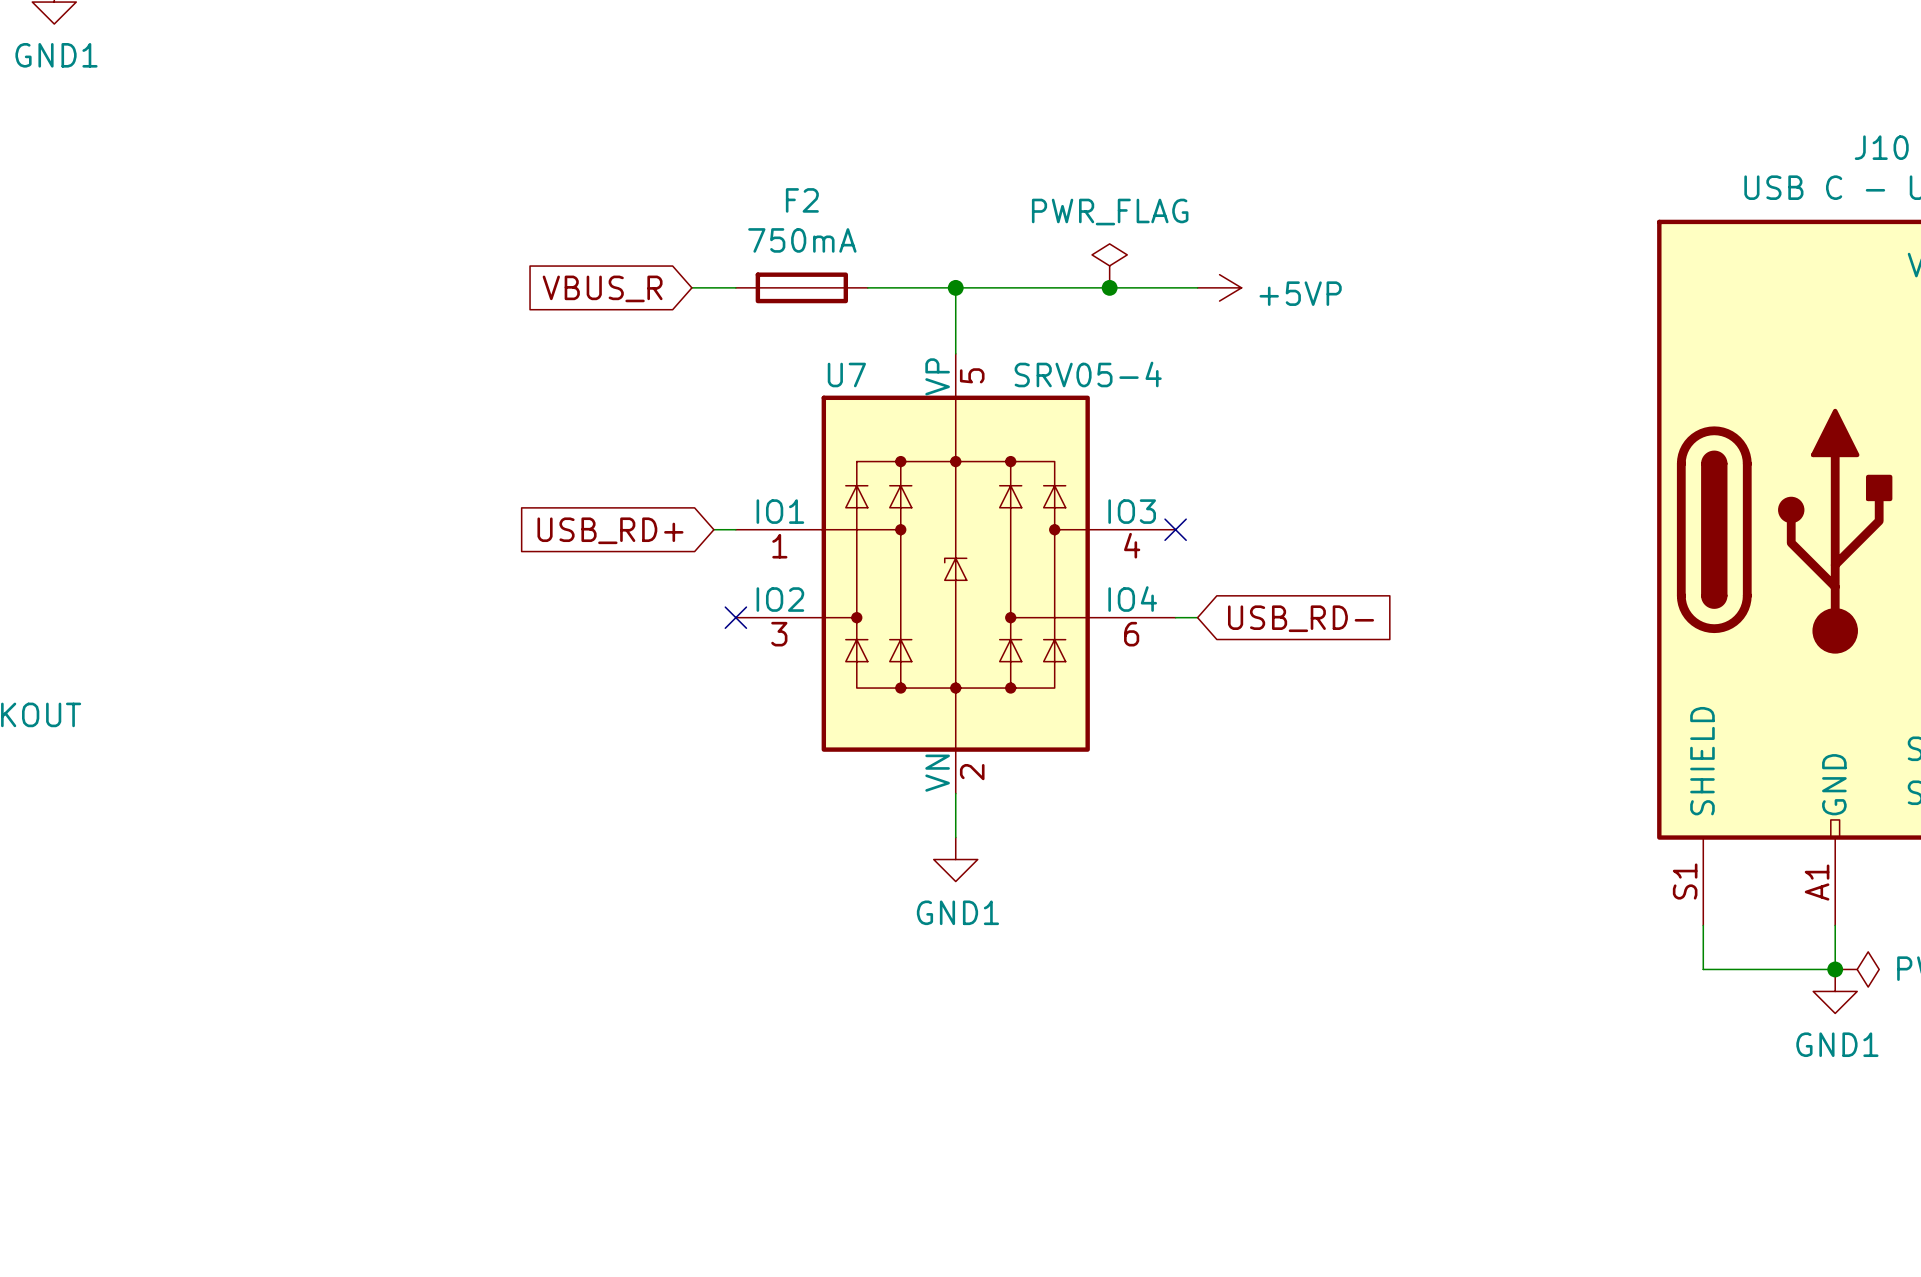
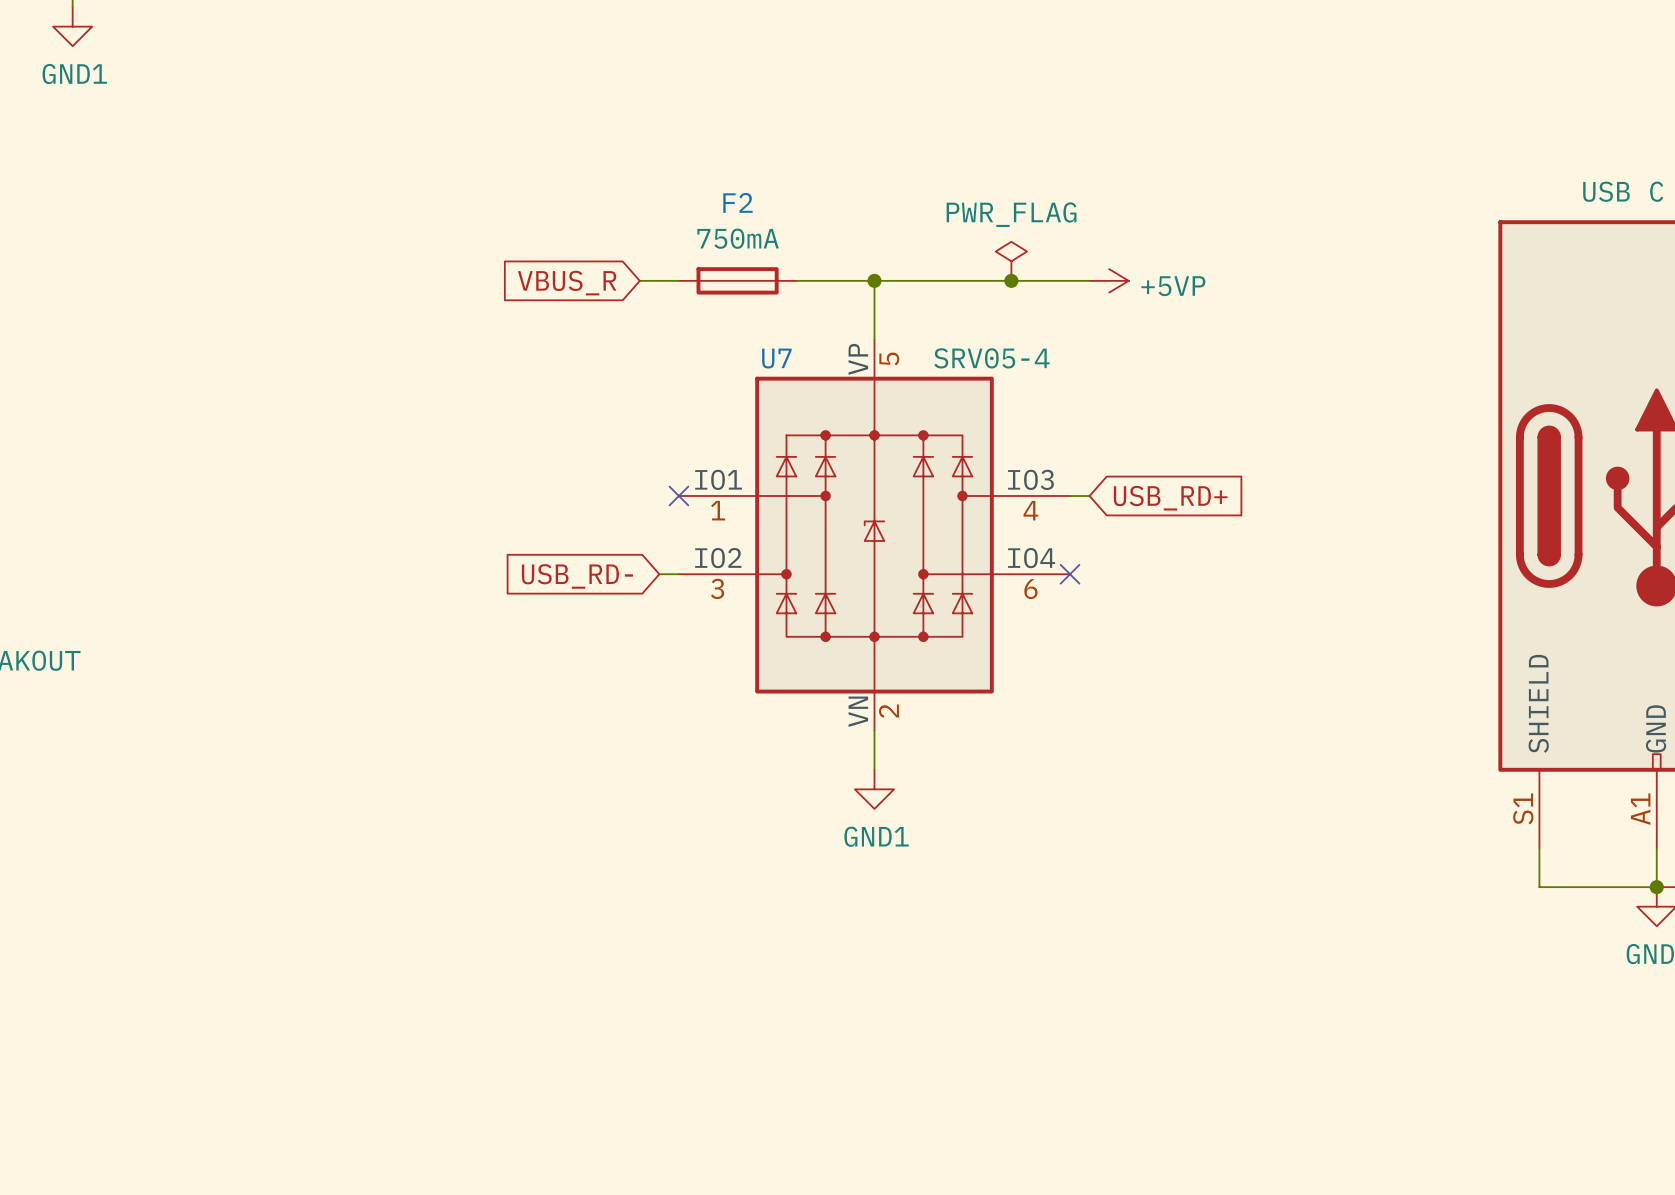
wire: (713, 529) (735, 529) -> (659, 574) (678, 574)
no-connect mark position: (1175, 529) -> (1070, 574)
global label: USB_RD+ (610, 530) -> none
global label: none -> USB_RD+ (1170, 498)
no-connect mark position: (735, 617) -> (678, 496)
wire: (1175, 617) (1197, 617) -> (1070, 496) (1089, 496)
global label: none -> USB_RD- (577, 576)
global label: USB_RD- (1301, 618) -> none

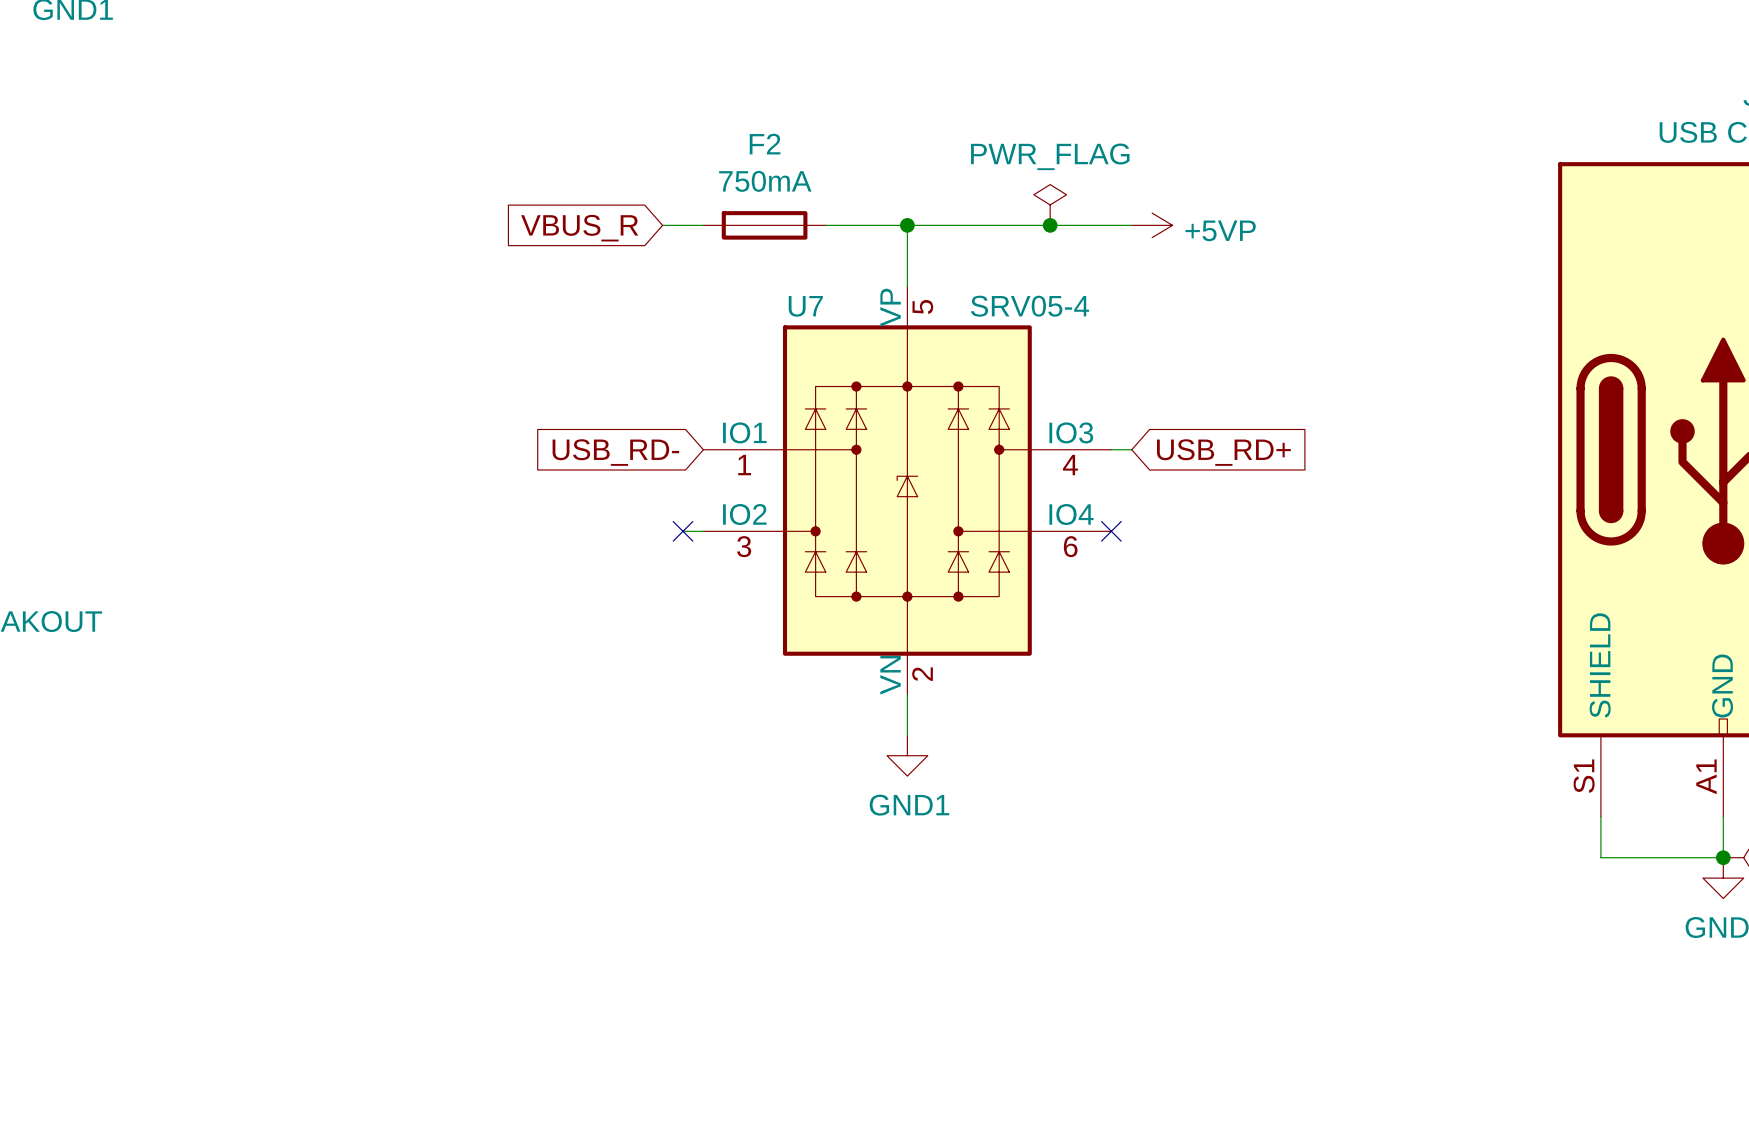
no-connect mark position: (678, 496) -> (683, 531)
global label position: USB_RD- (577, 576) -> USB_RD- (615, 452)

